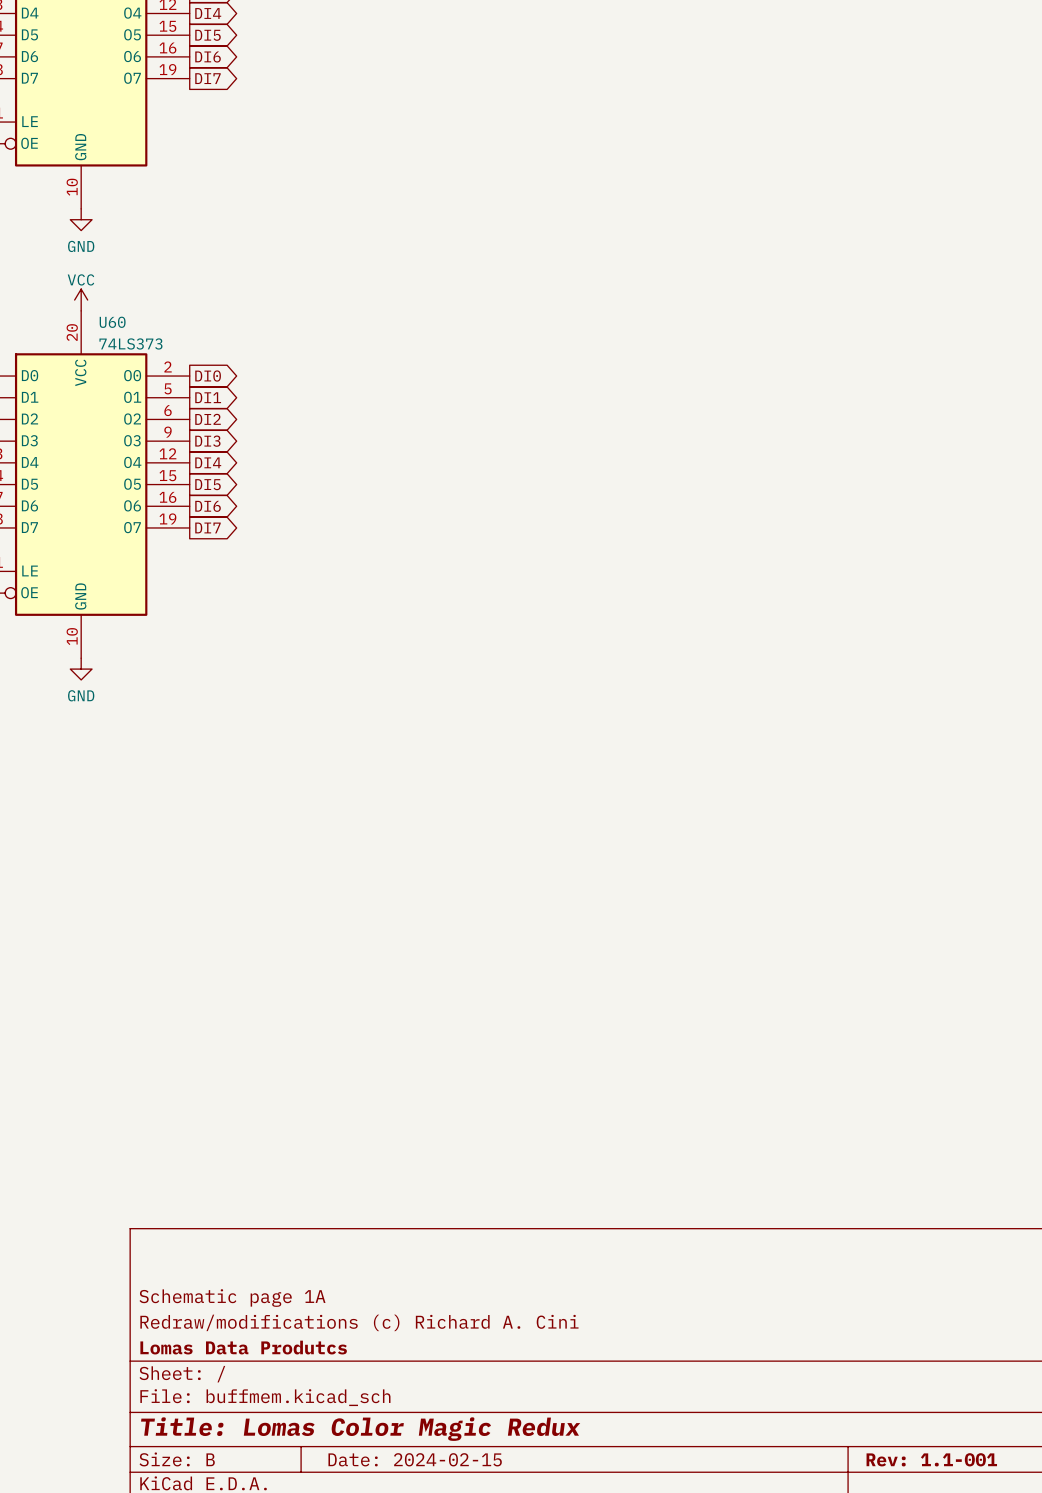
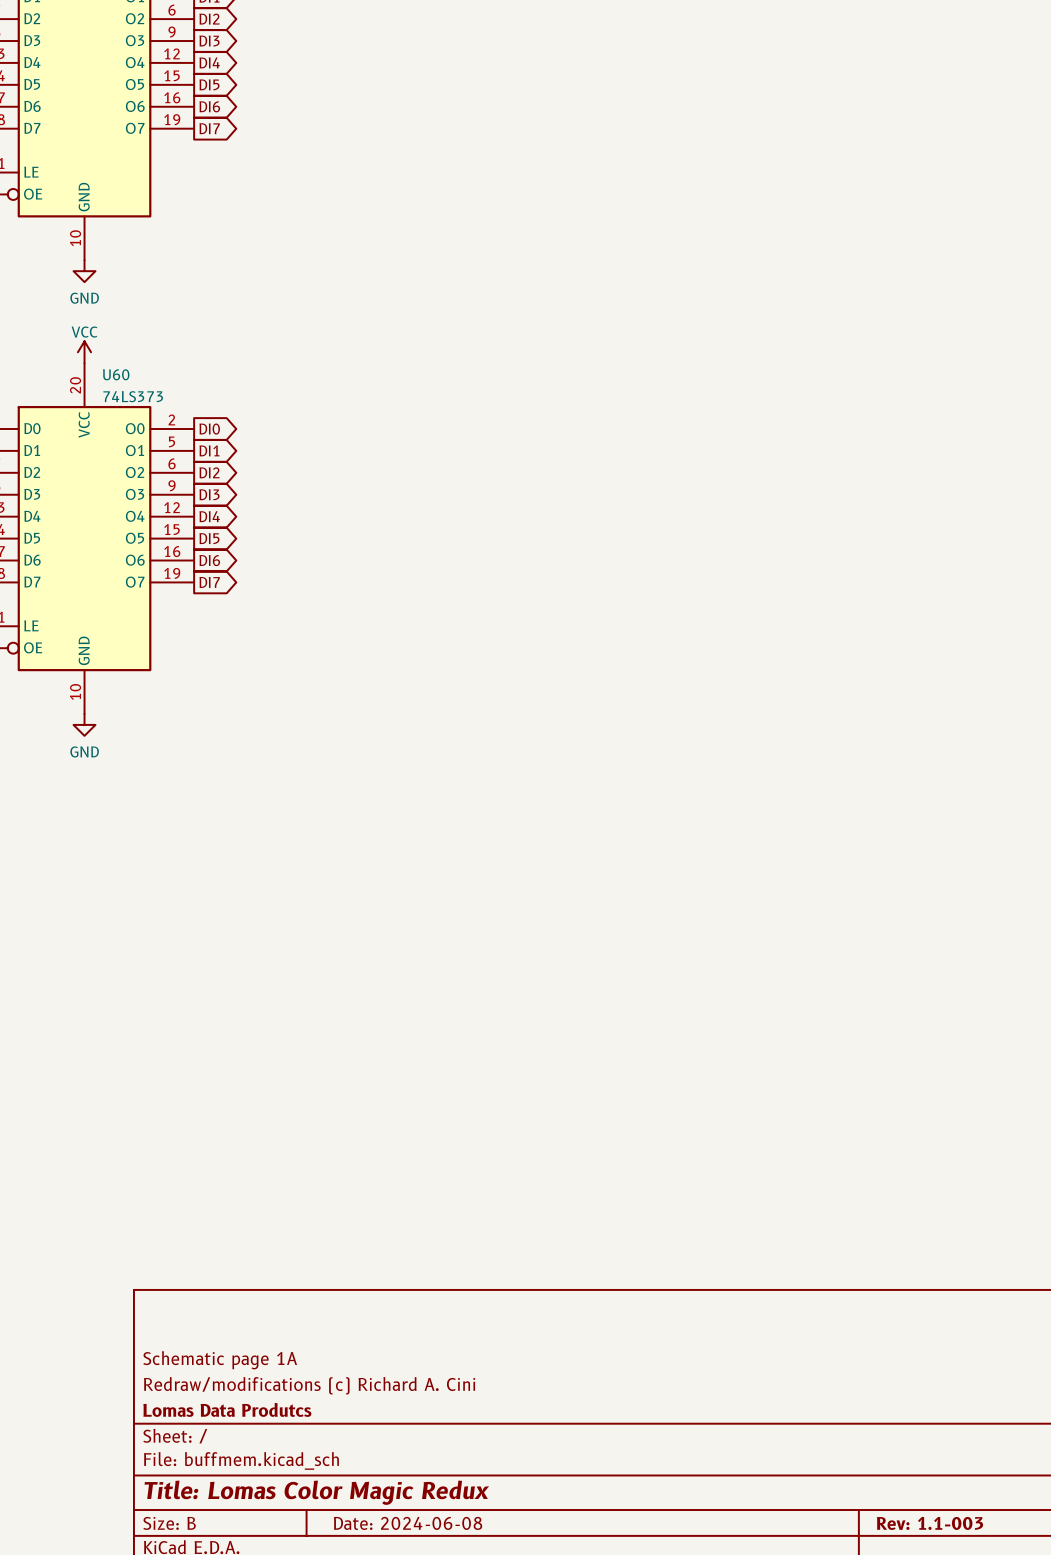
title block: Date: 2024-02-15 (415, 1459) -> Date: 2024-06-08 (408, 1523)
title block: Rev: 1.1-001 (931, 1459) -> Rev: 1.1-003 (929, 1523)

